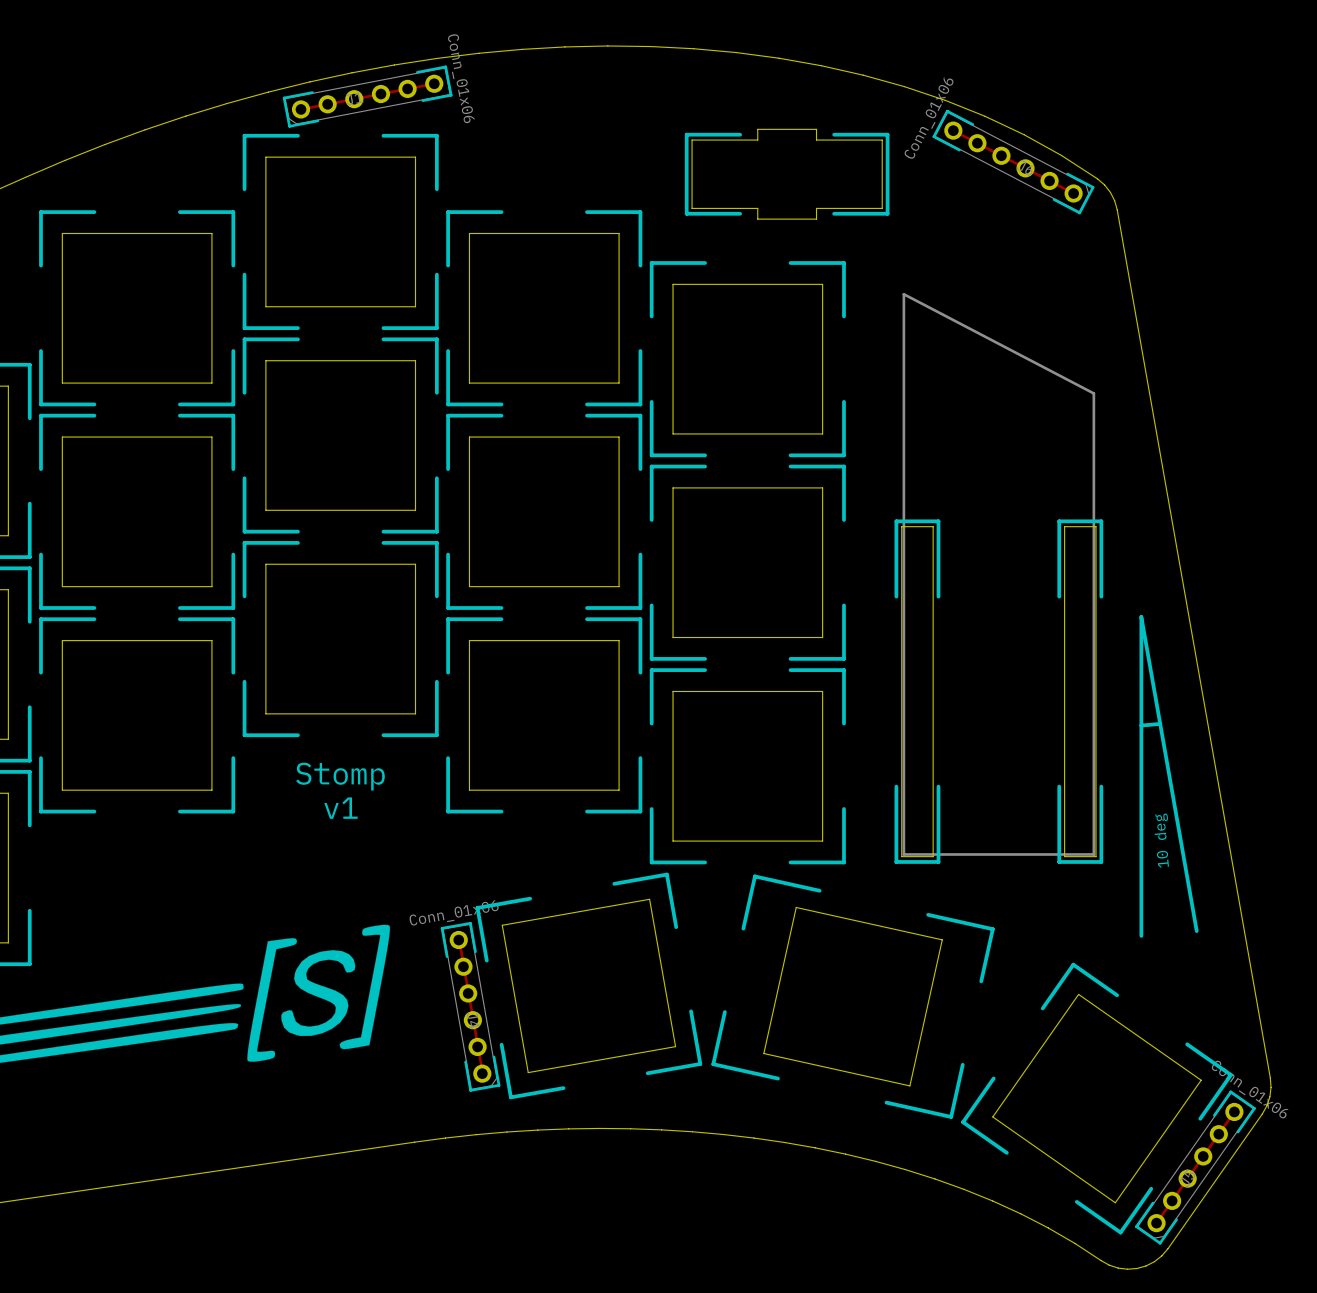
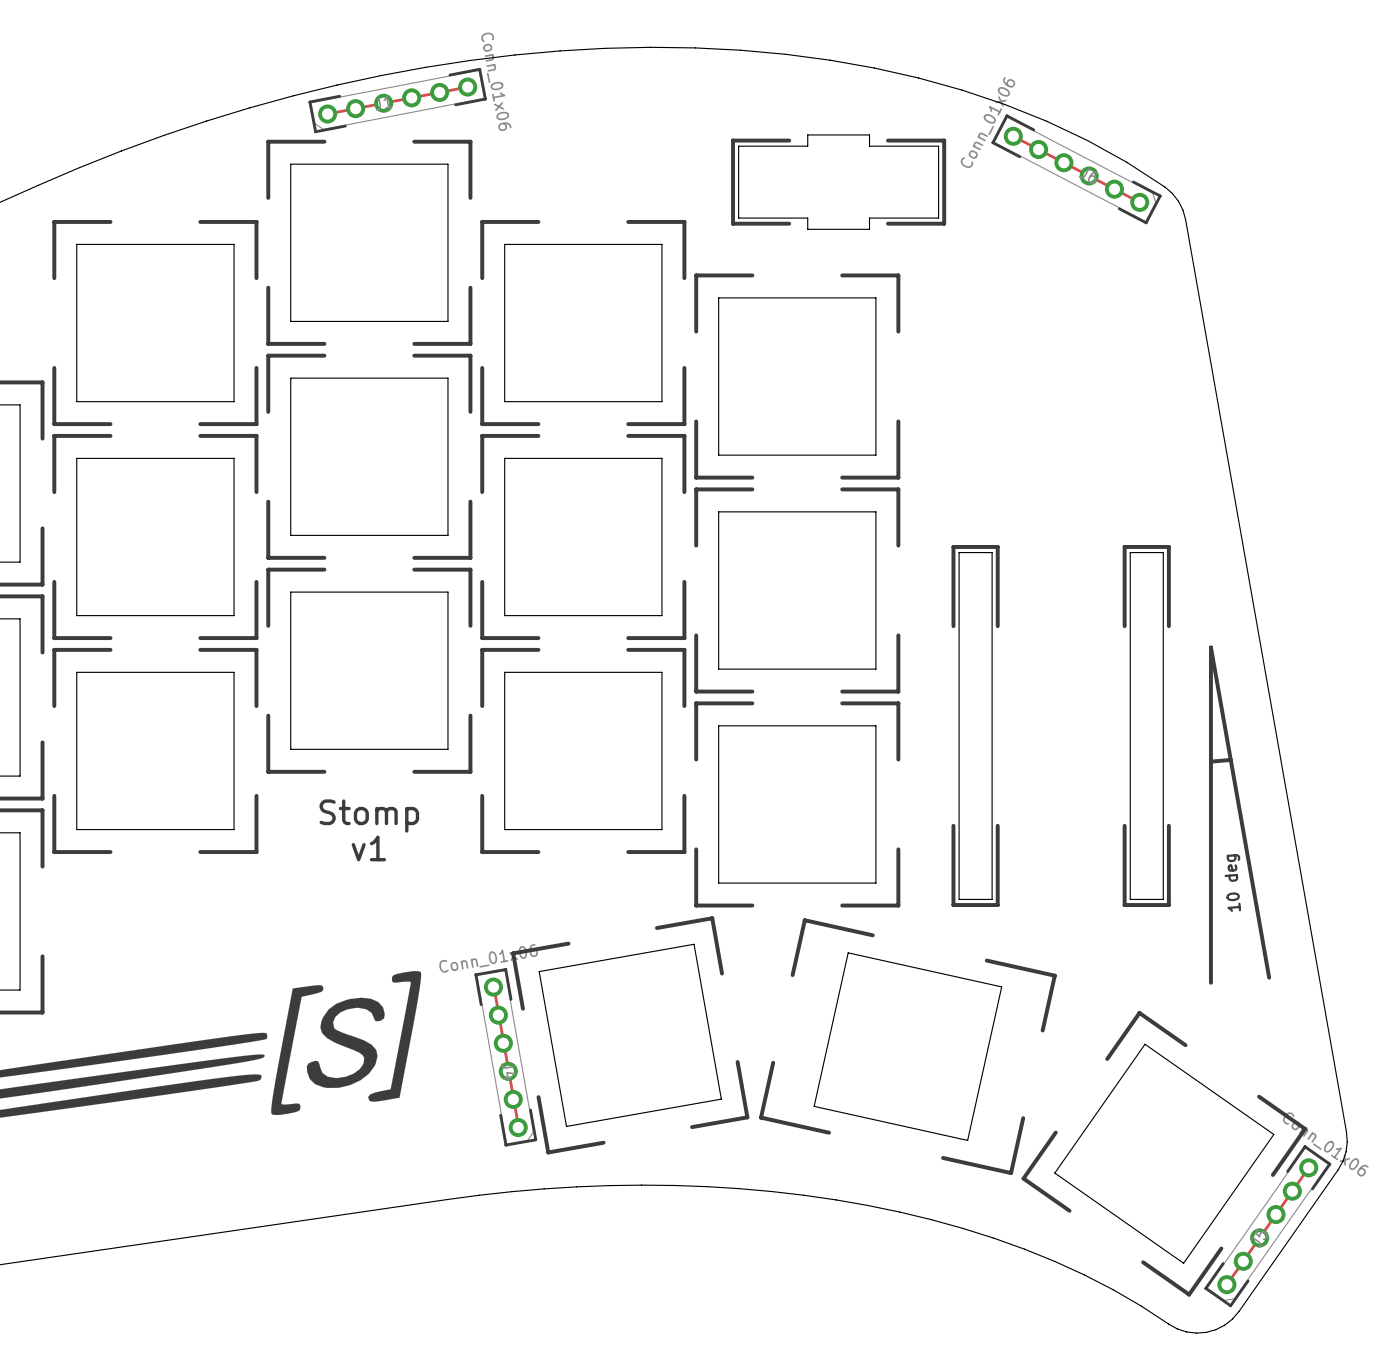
line: (903, 294) (1093, 393) (1093, 854) (903, 854) (903, 294) -> none

